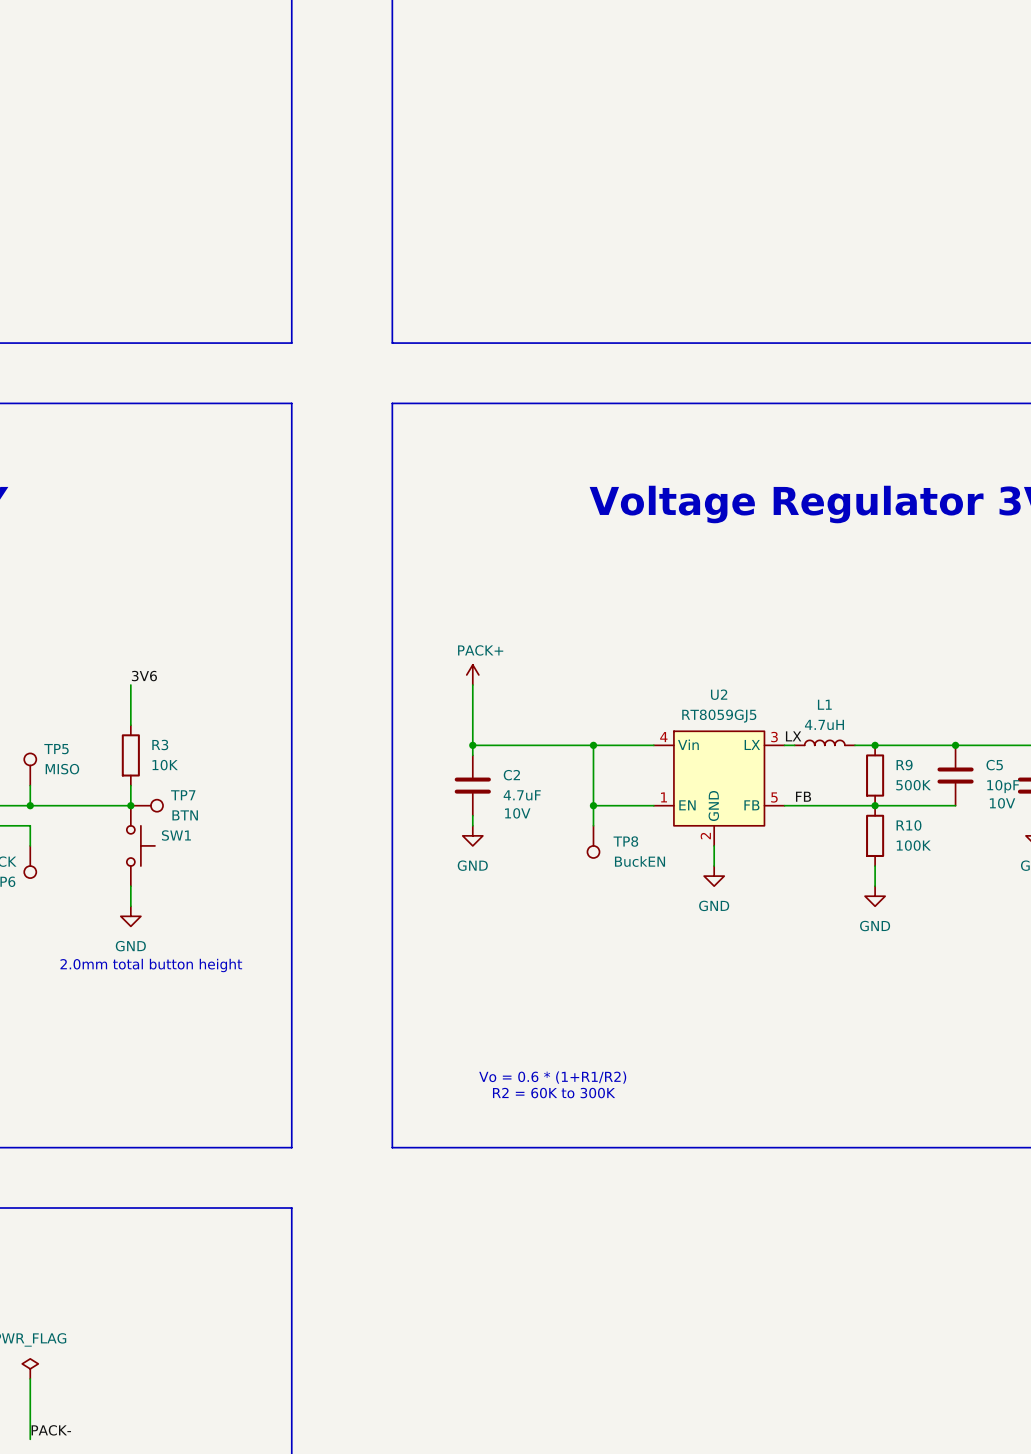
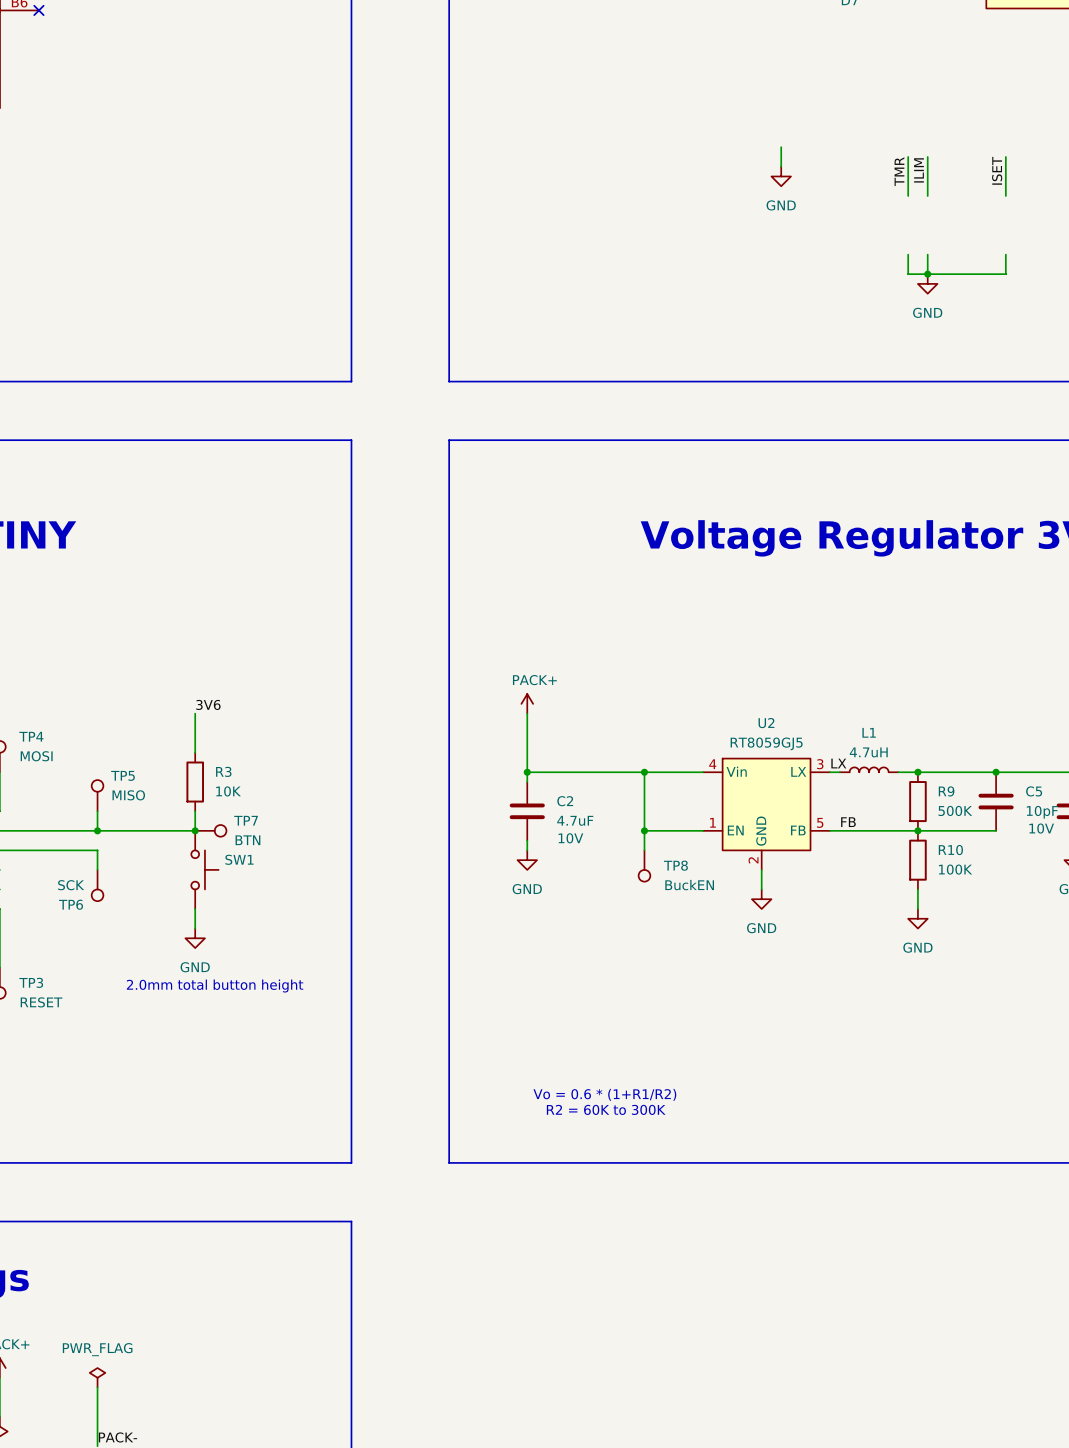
wire: none -> (781, 147) (781, 166)
wire: none -> (908, 156) (908, 196)
wire: none -> (927, 156) (927, 196)
wire: none -> (1005, 156) (1005, 196)
label: none -> ILIM (919, 170)
label: none -> TMR (899, 171)
label: none -> ISET (997, 170)
power symbol: none -> GND (781, 176)
wire: none -> (908, 254) (908, 274) (1005, 274) (1005, 254)
wire: none -> (927, 254) (927, 274)
junction: none -> (927, 274)
power symbol: none -> GND (927, 283)

